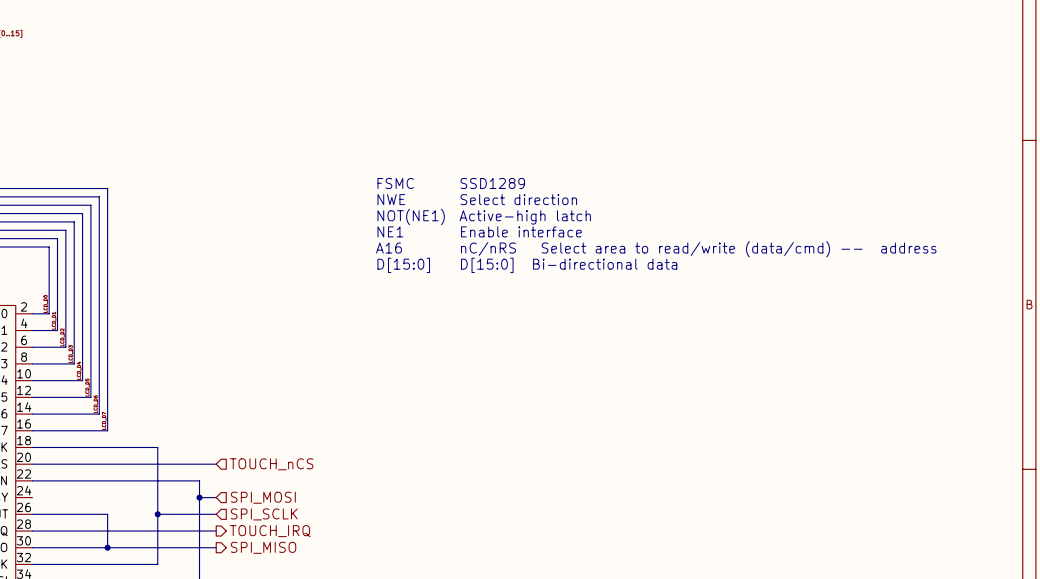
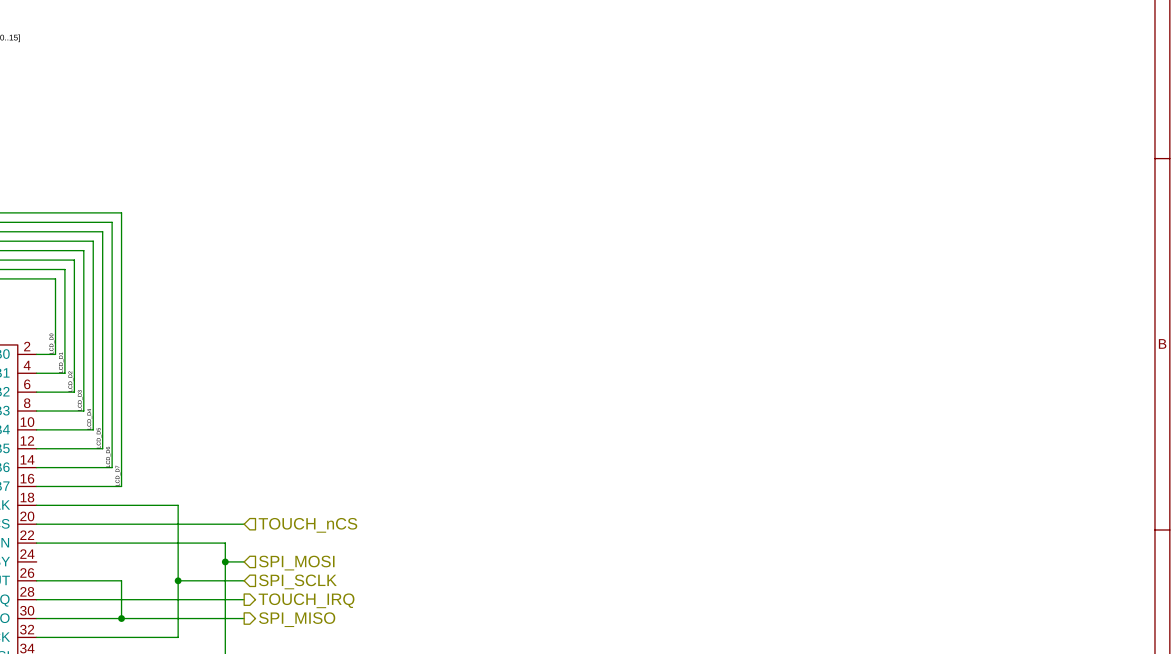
text: FSMC (395, 183) -> none
text: SSD1289 (492, 183) -> none
text: NWE (391, 199) -> none
text: Select direction (518, 199) -> none
text: NOT(NE1) (411, 216) -> none
text: Active-high latch (525, 217) -> none
text: NE1 (390, 231) -> none
text: Enable interface (521, 231) -> none
text: A16 (388, 248) -> none
text: nC/nRS Select area to read/write (data/cmd) -- address (698, 249) -> none
text: D[15:0] (403, 265) -> none
text: D[15:0] Bi-directional data (569, 265) -> none

